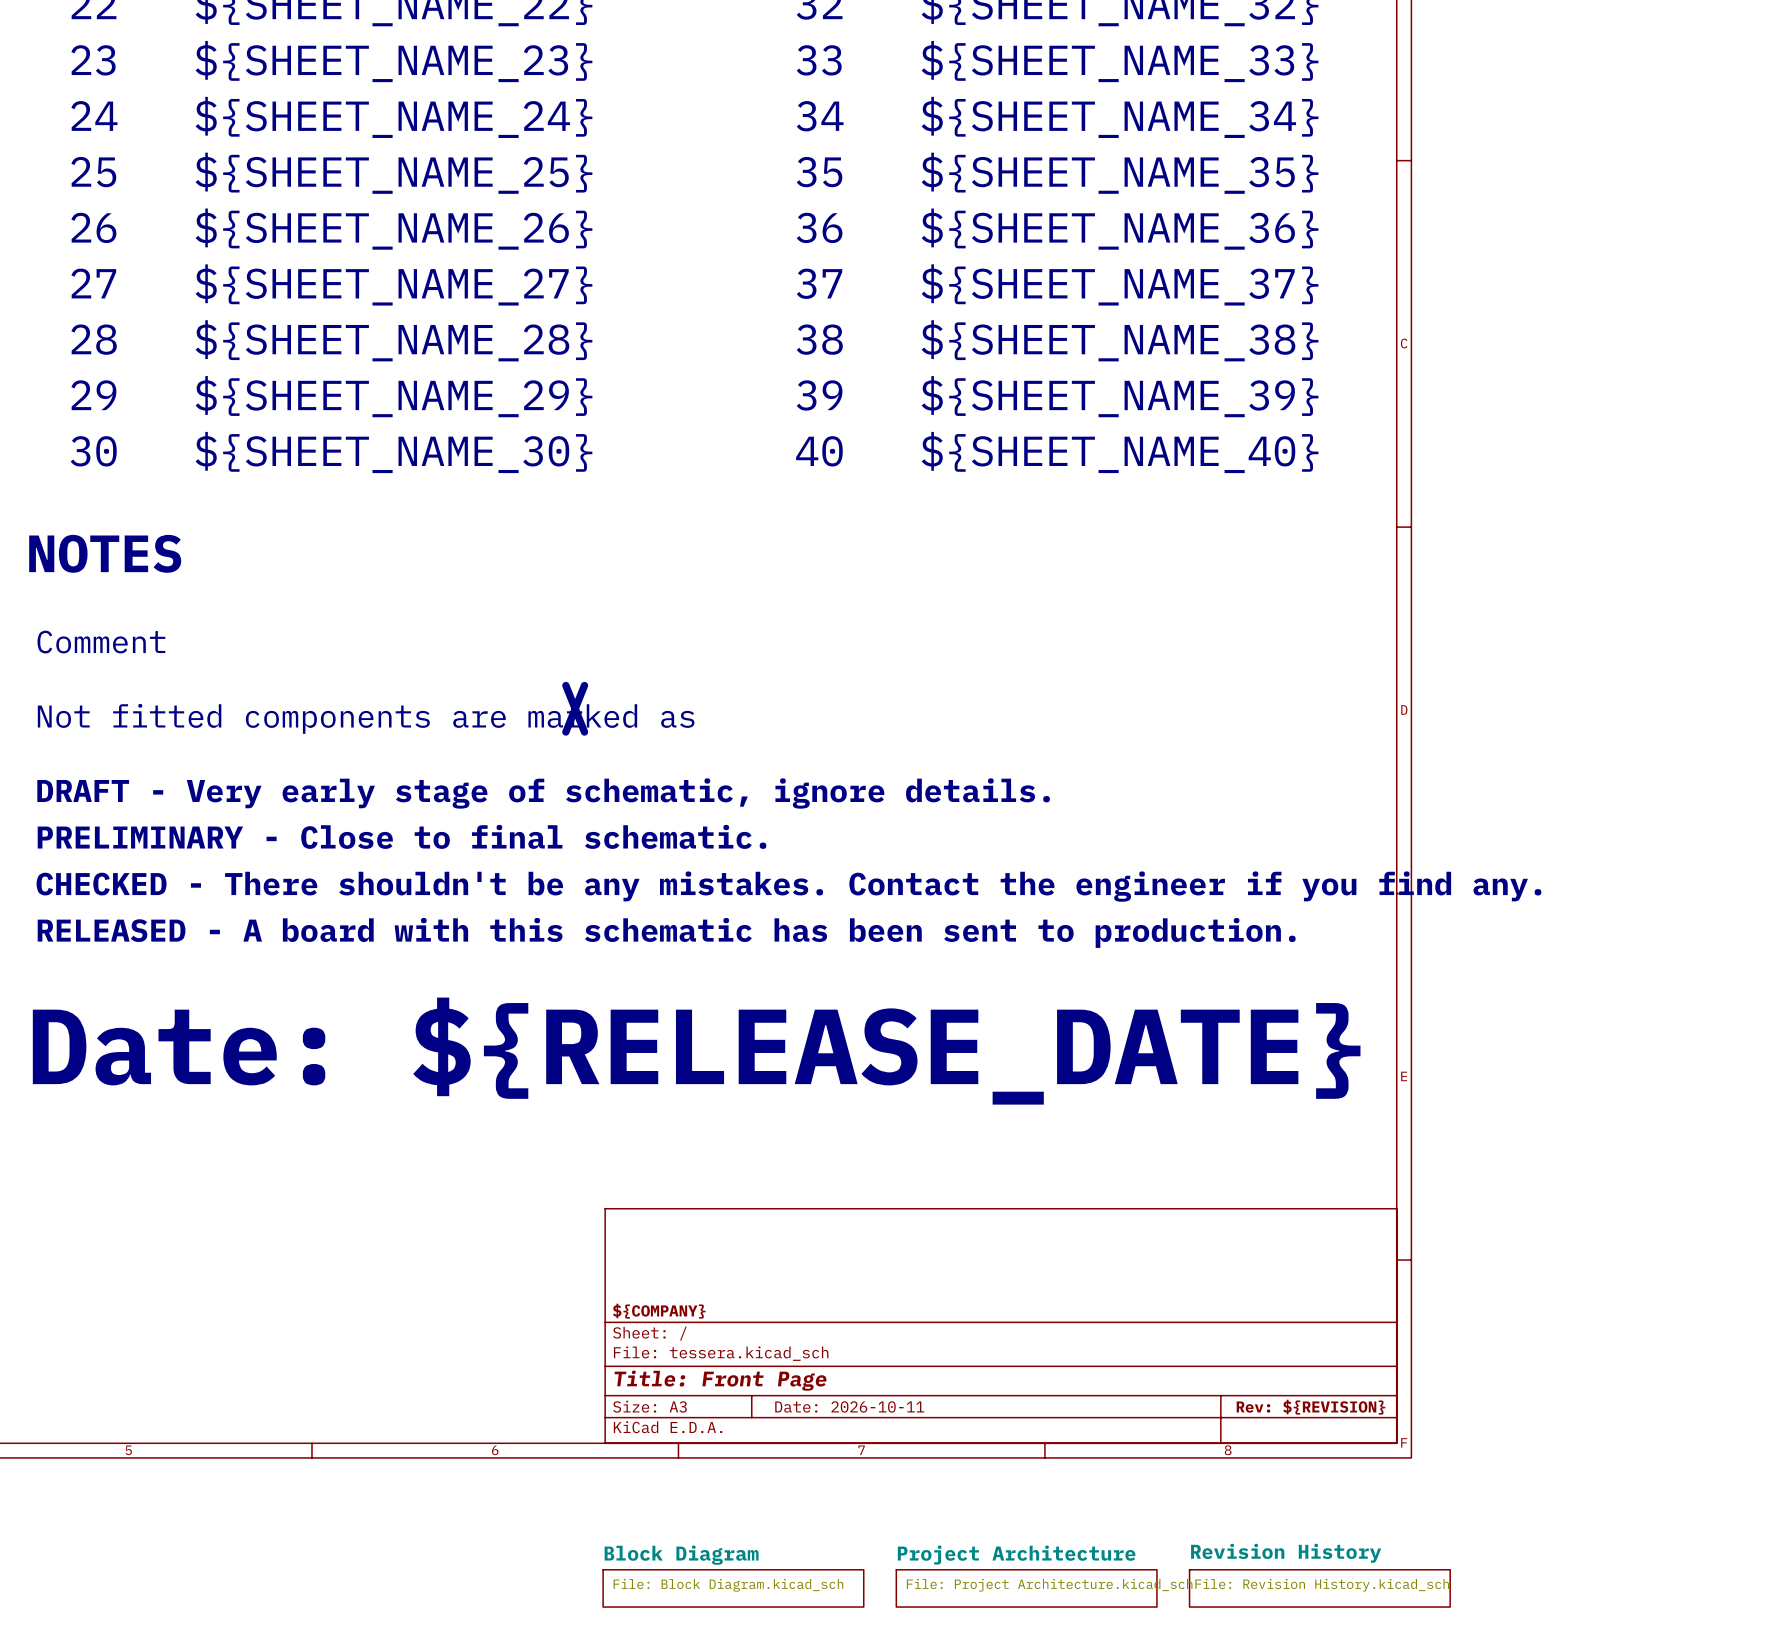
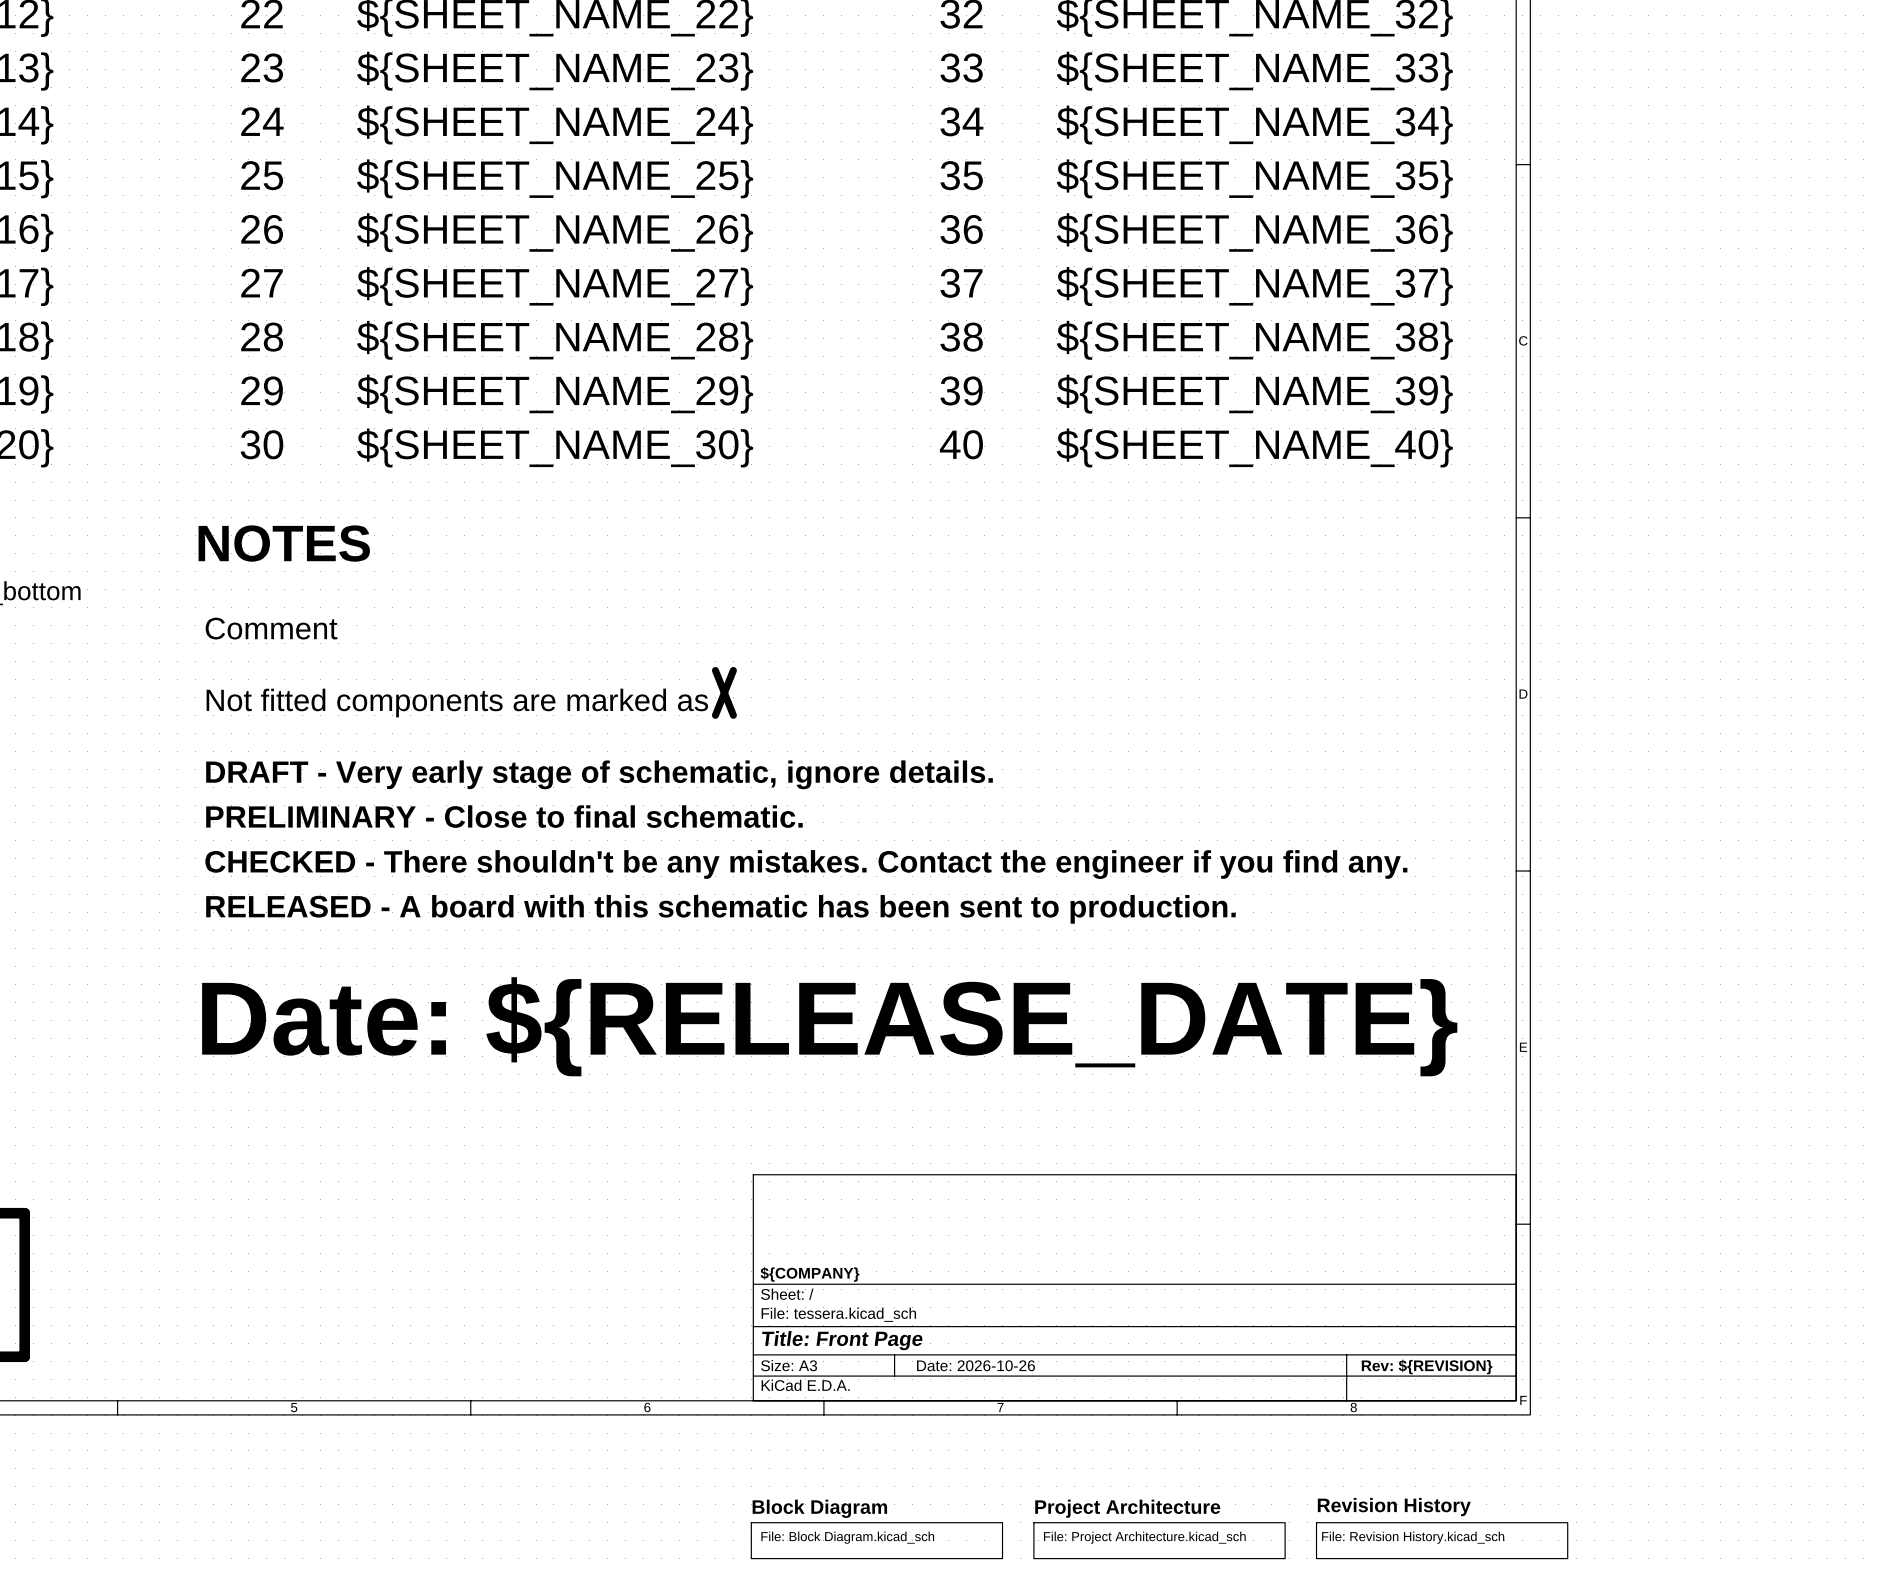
title block: Date: 2026-10-11 (849, 1406) -> Date: 2026-10-26 (976, 1365)

